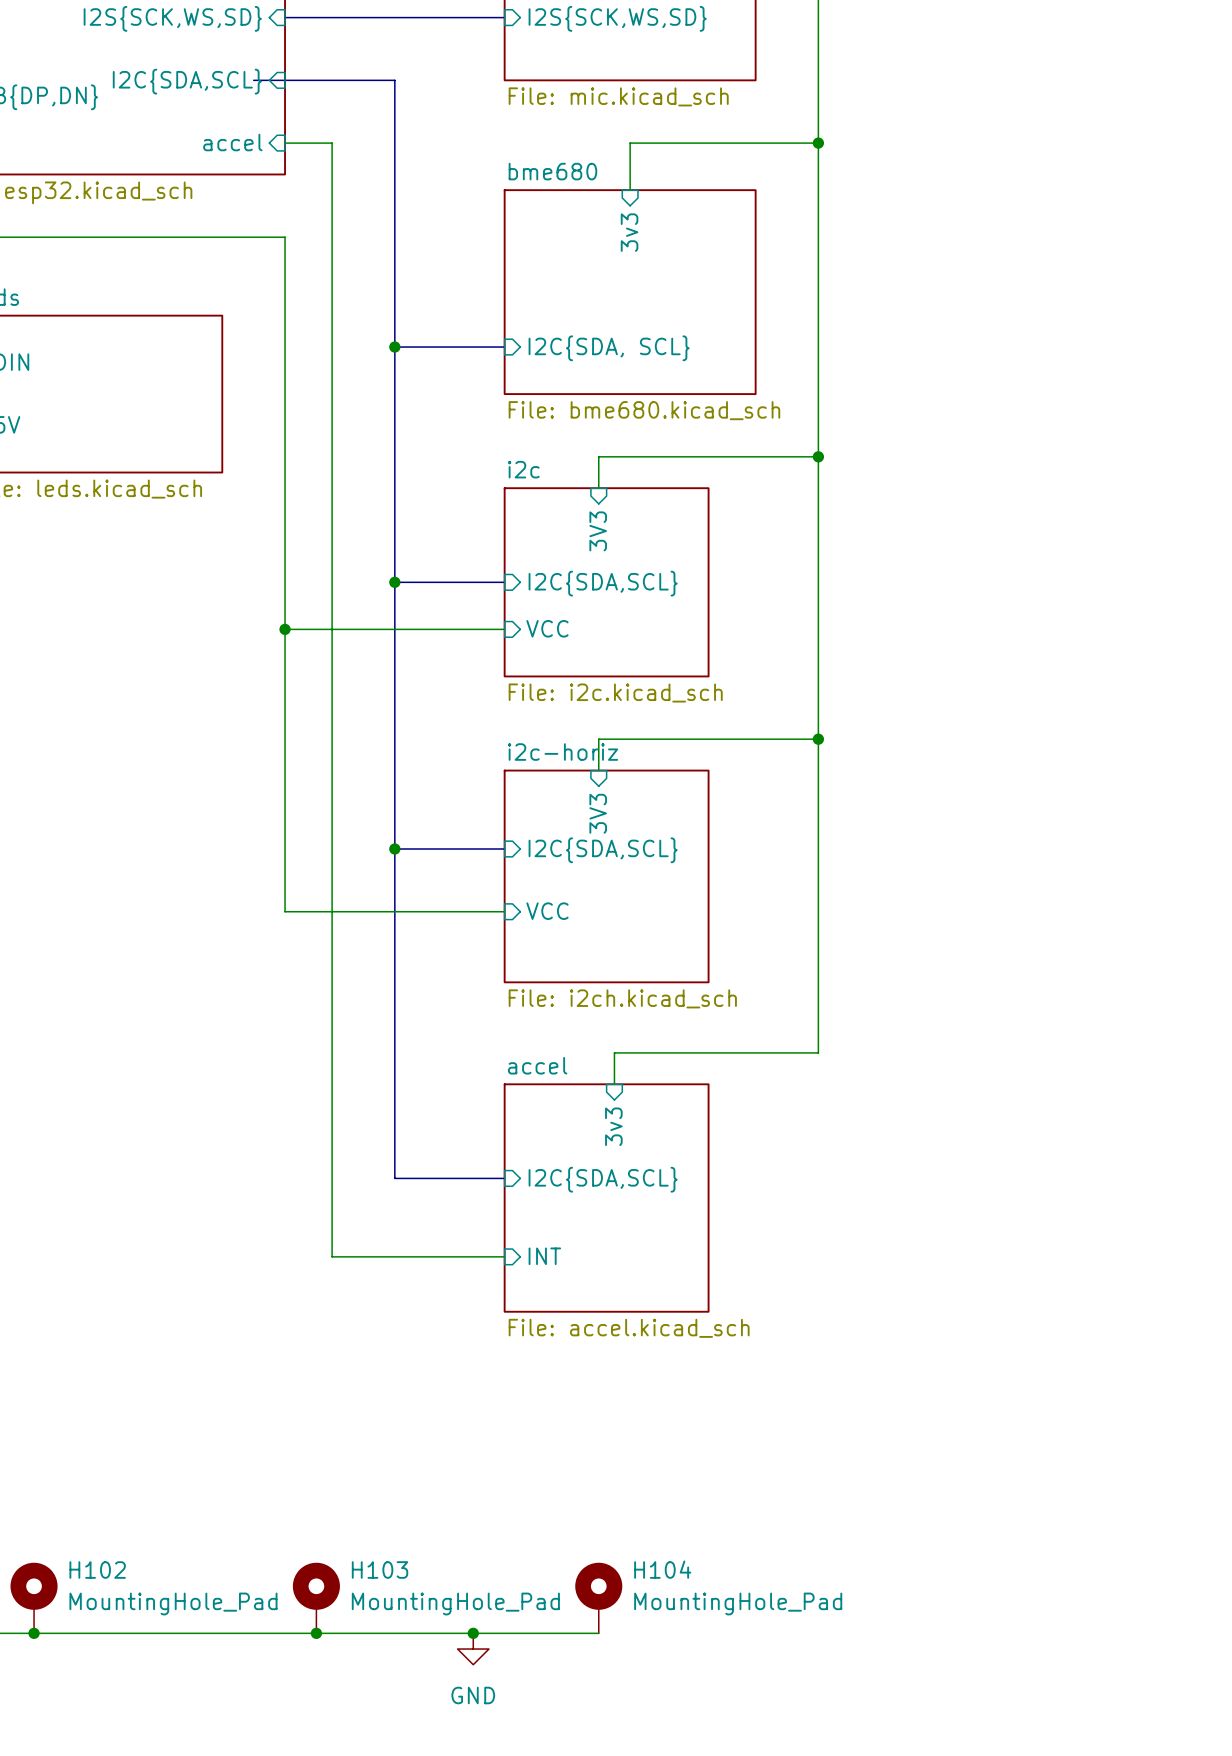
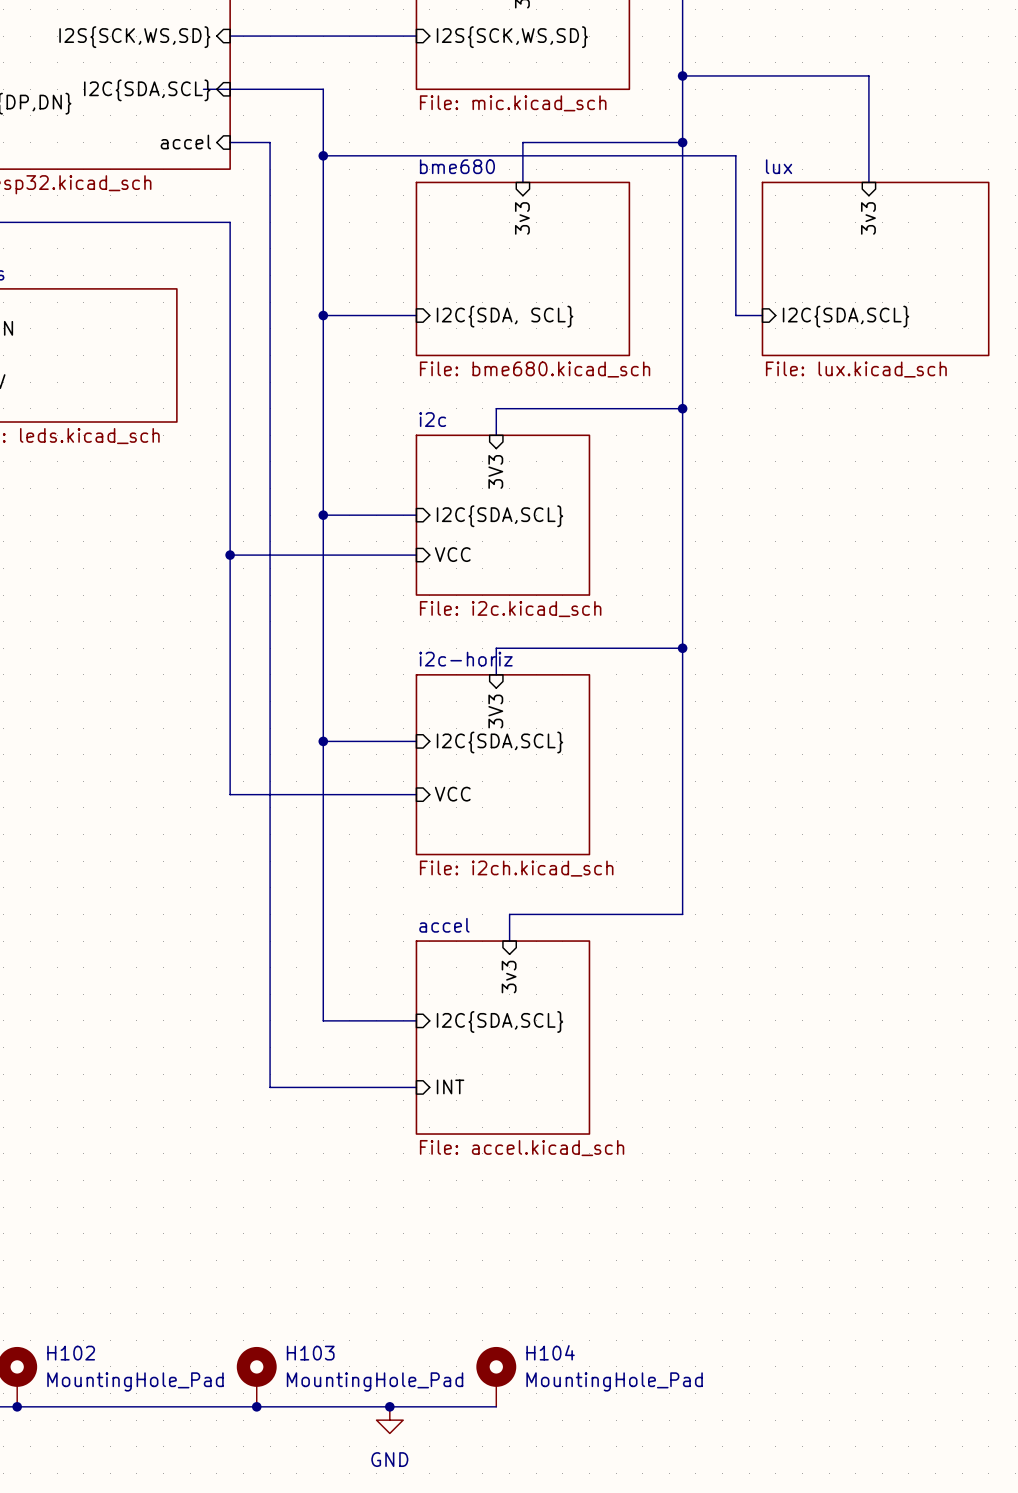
wire: none -> (682, 75) (868, 75) (868, 182)
junction: none -> (682, 75)
bus: none -> (323, 155) (735, 155) (735, 315) (762, 315)
junction: none -> (323, 155)
sheet pin: none -> 3v3 (868, 218)
sheet lux: none -> File: lux.kicad_sch (875, 268)
sheet pin: none -> I2C{SDA,SCL} (846, 316)

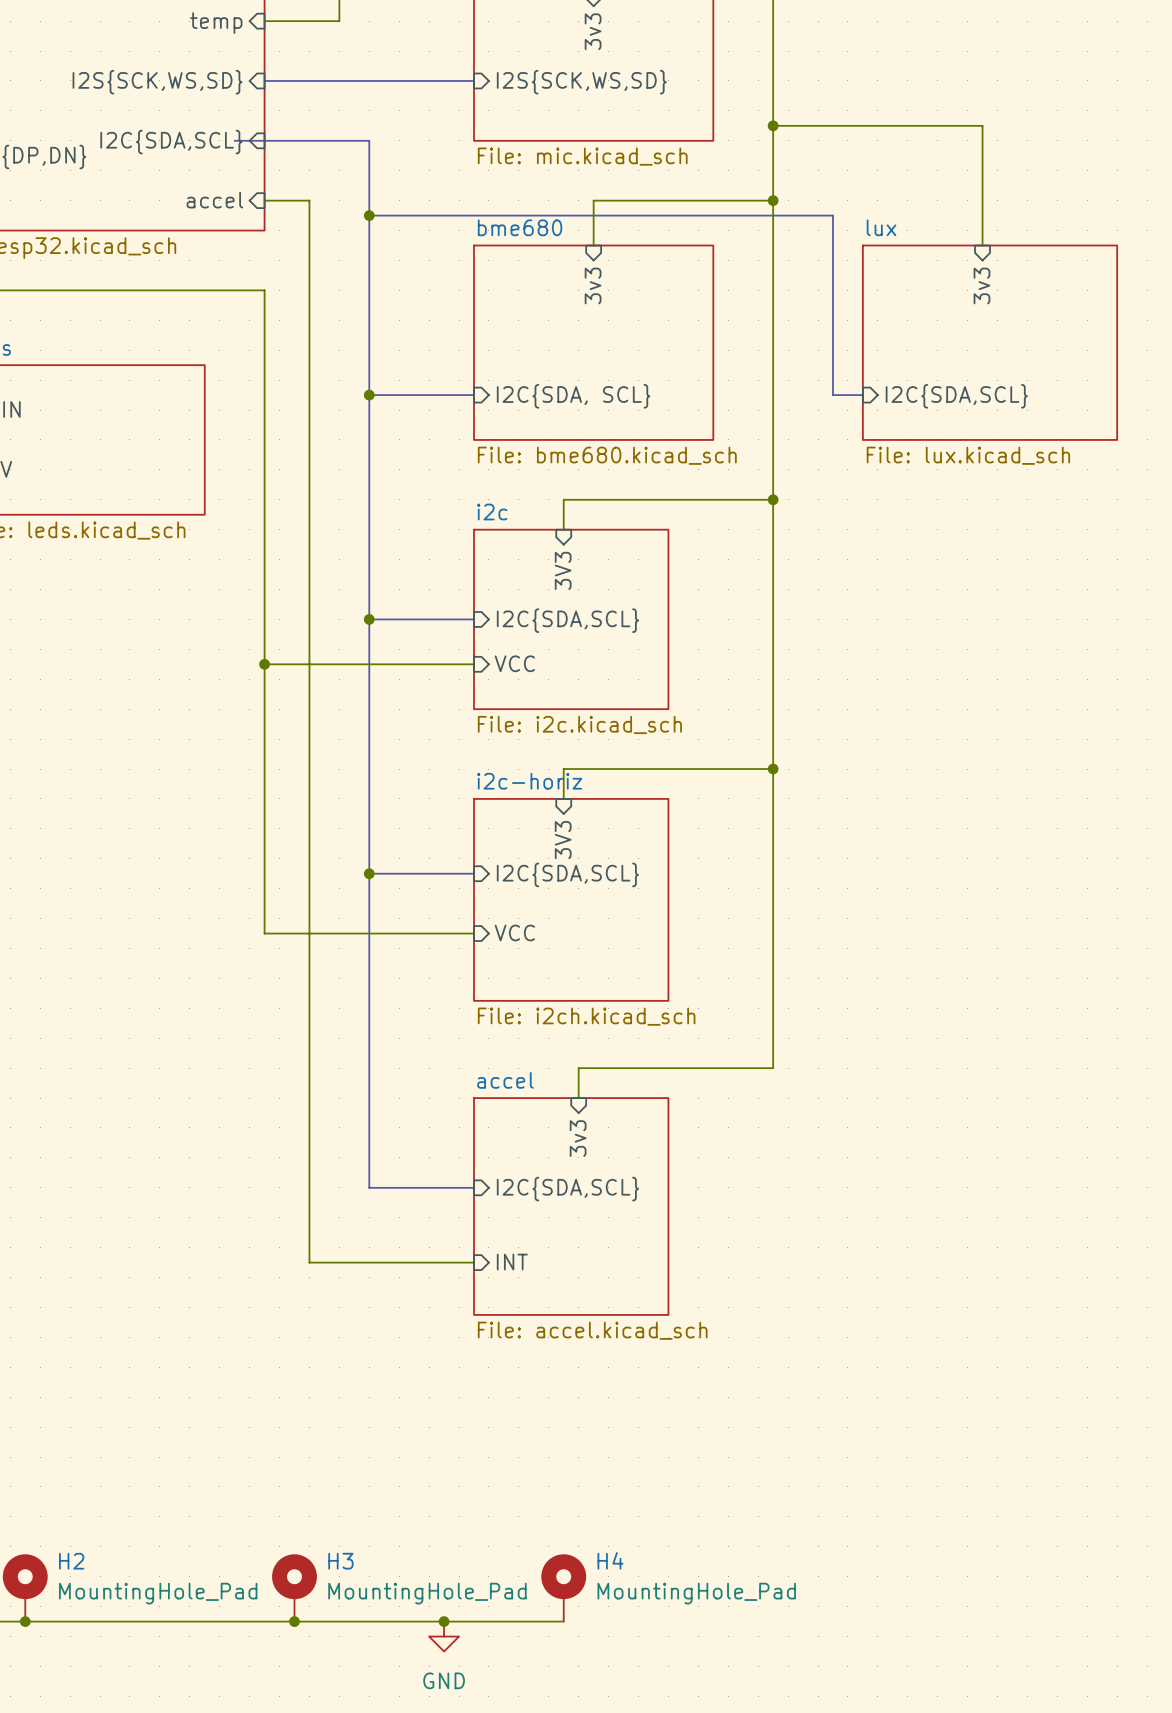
H104 name: H104 (550, 1352) -> H4 (610, 1560)
H102 name: H102 (71, 1353) -> H2 (71, 1561)
H103 name: H103 (310, 1353) -> H3 (340, 1561)

